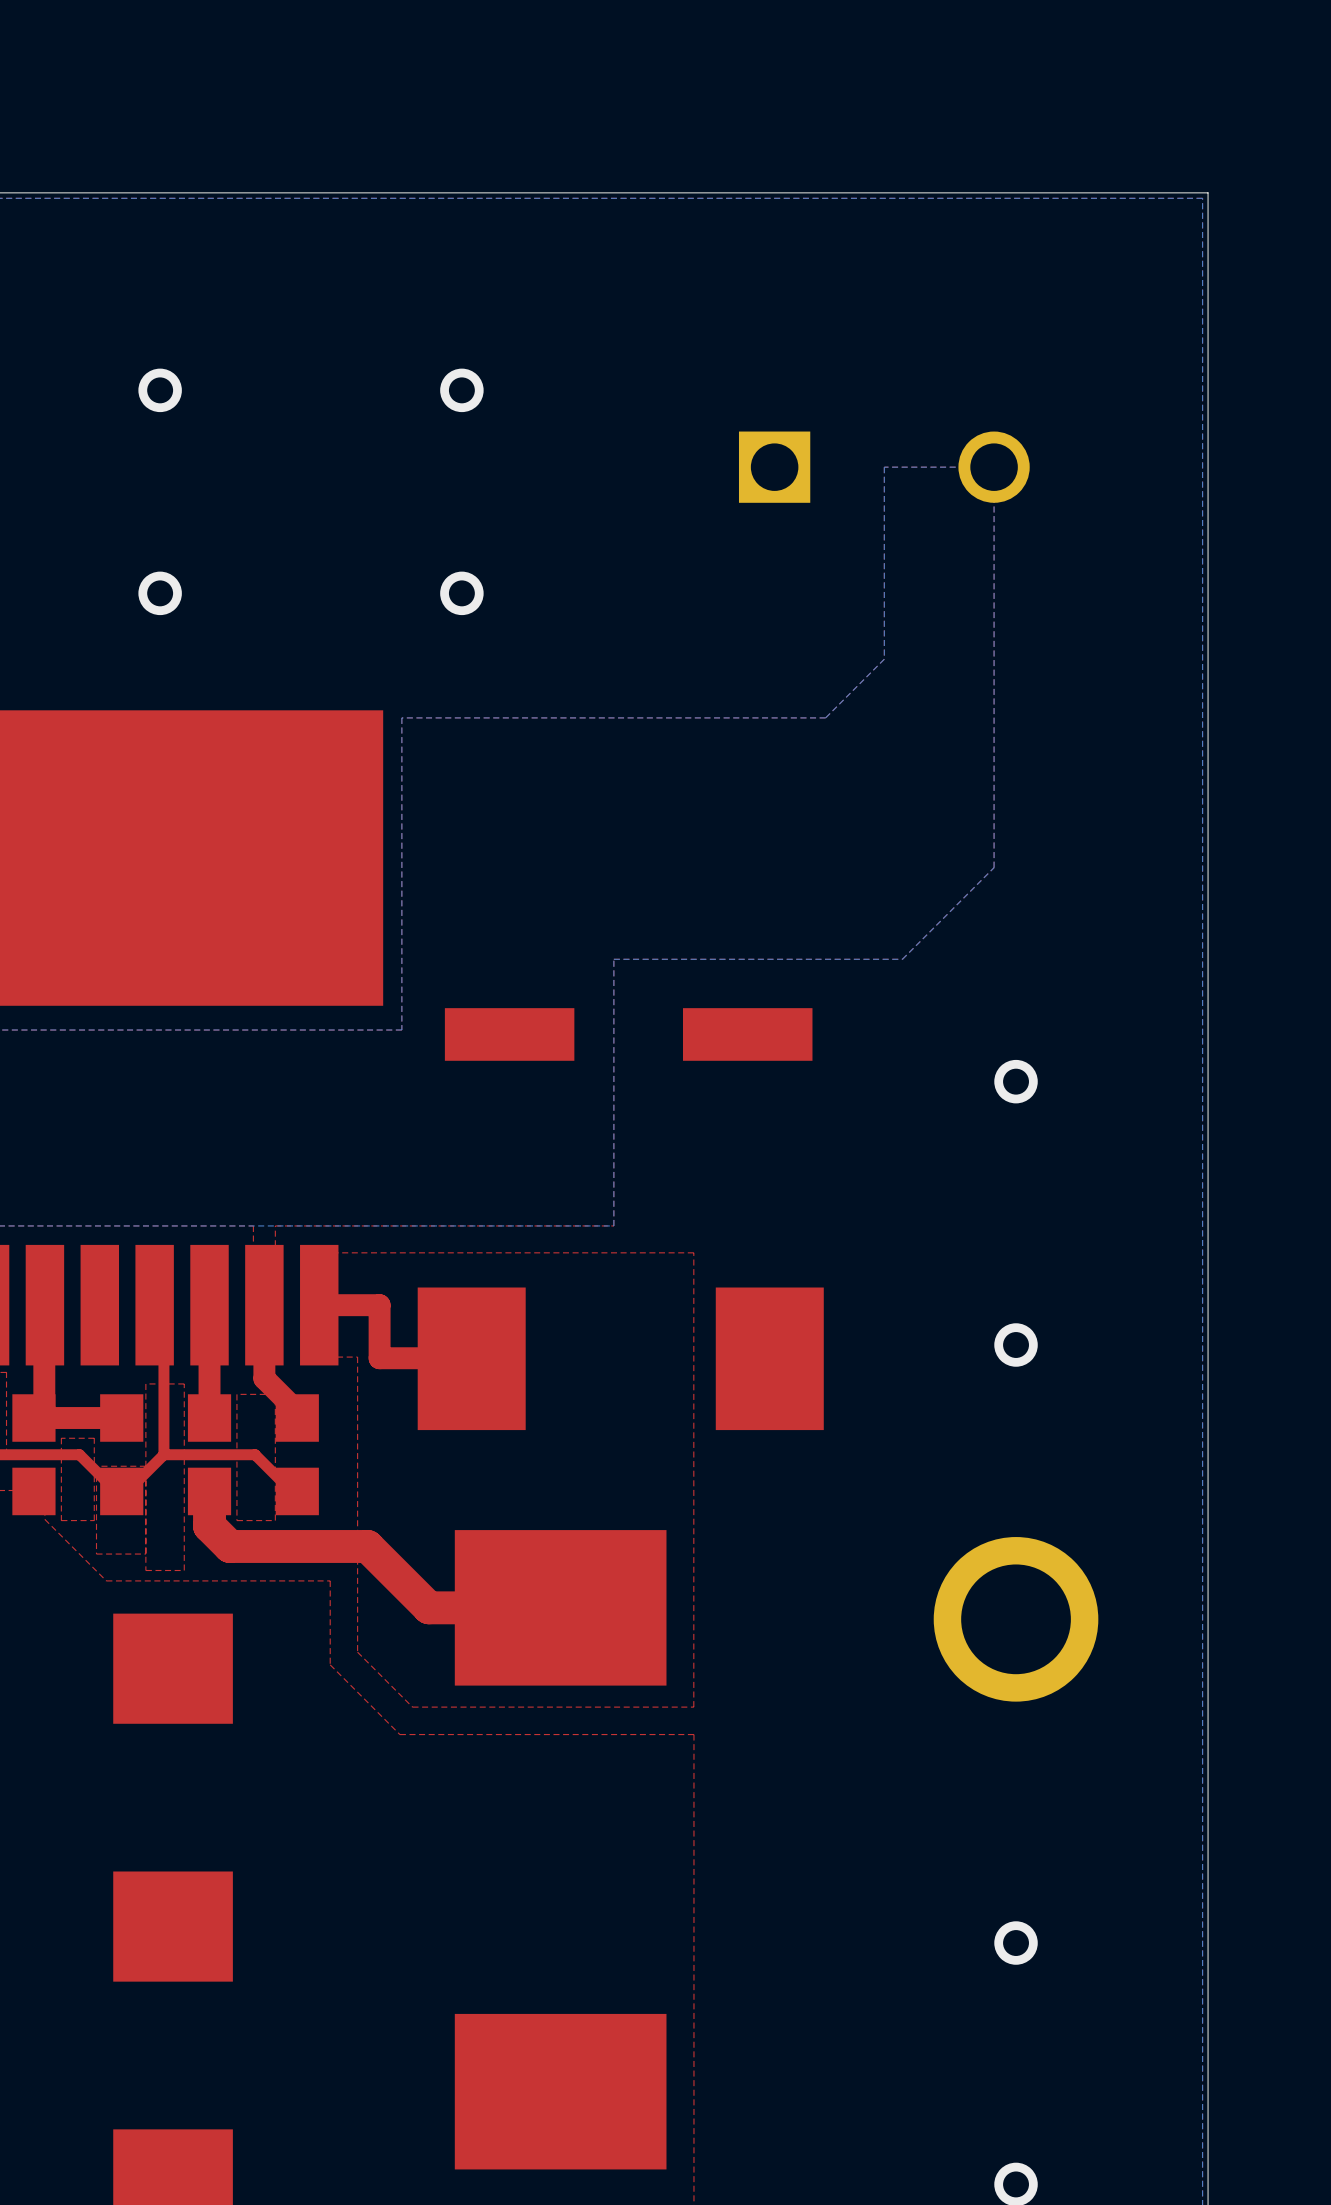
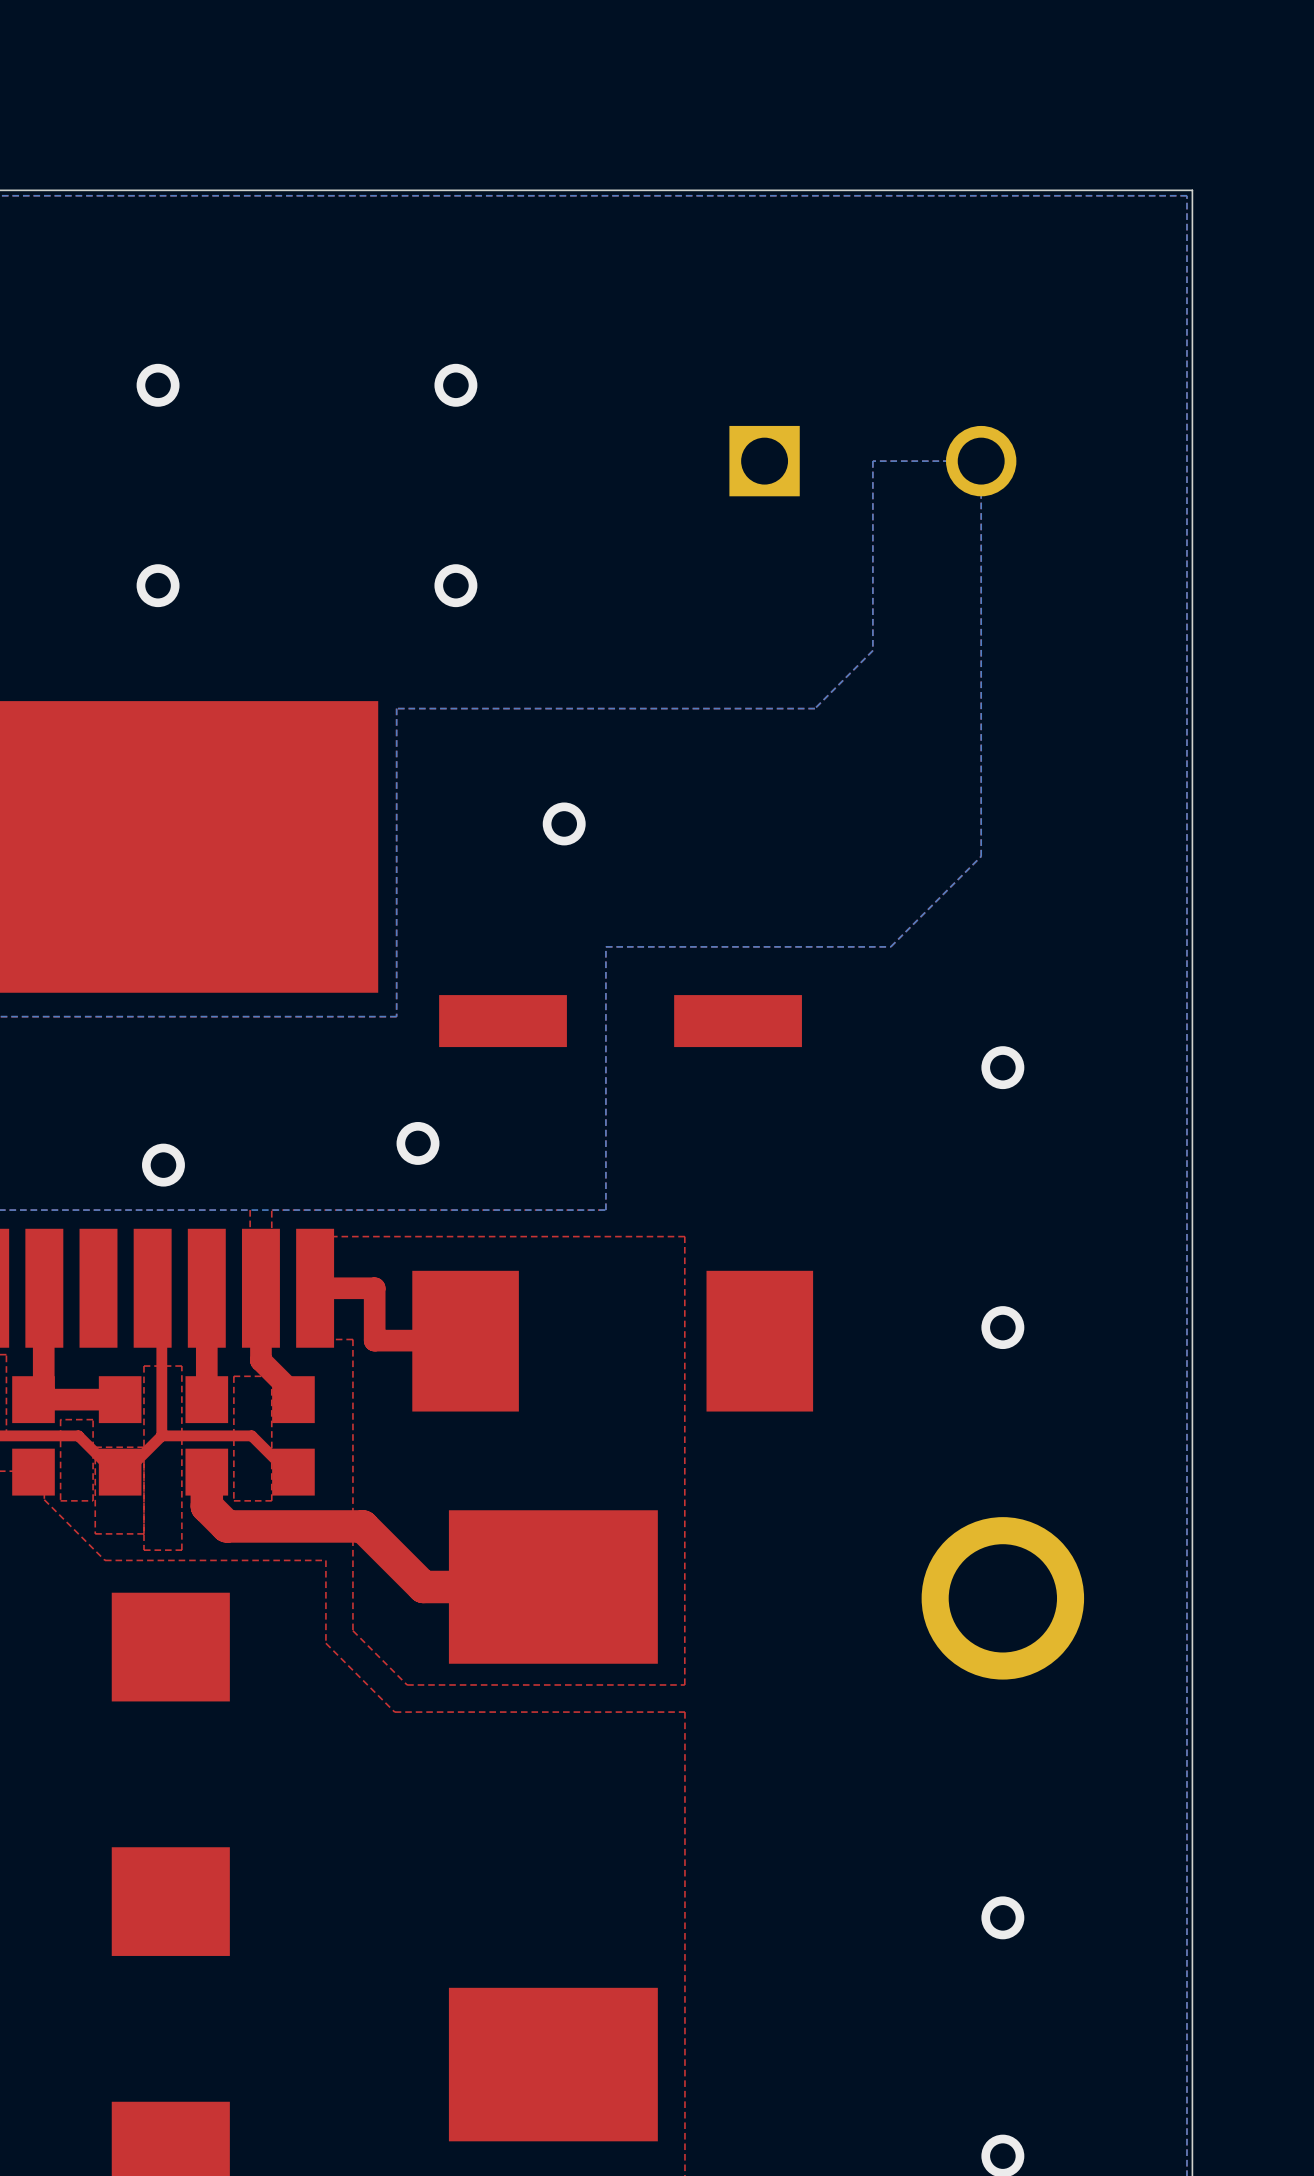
via: none -> (564, 823)
via: none -> (418, 1143)
via: none -> (163, 1165)

